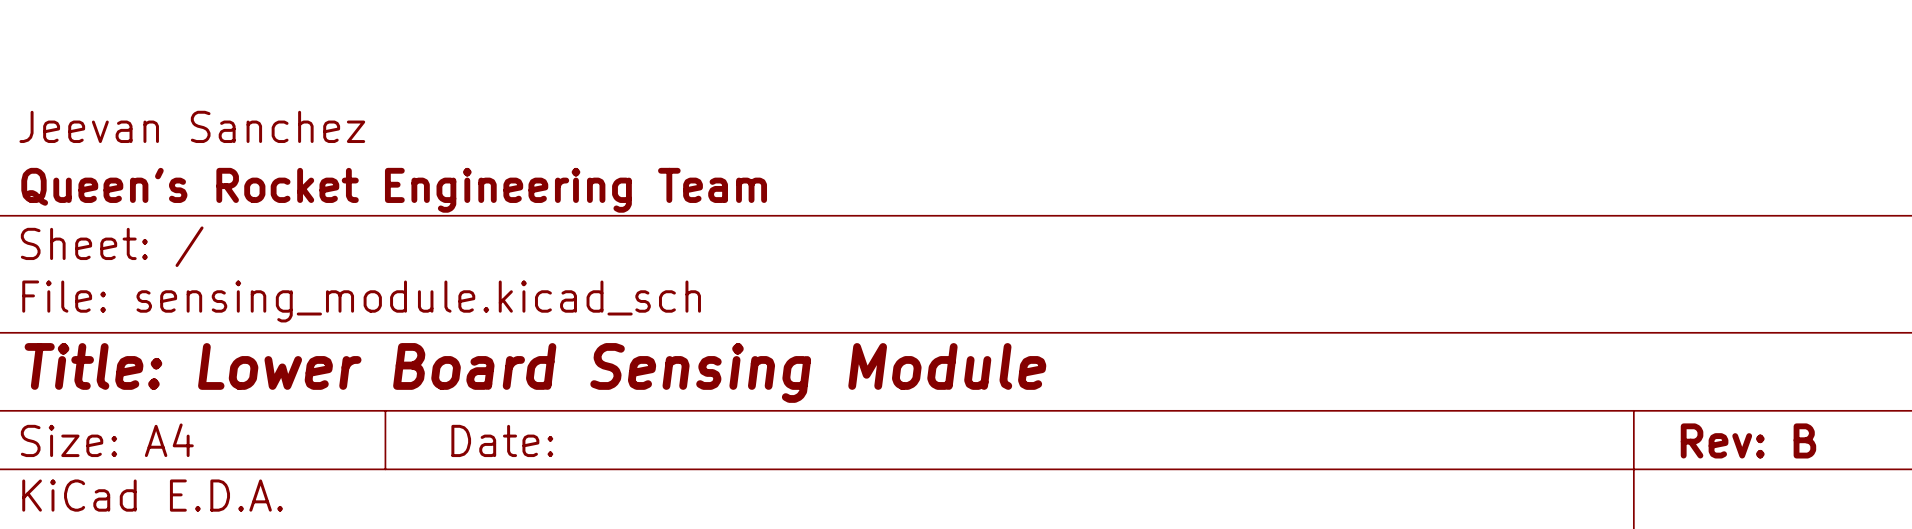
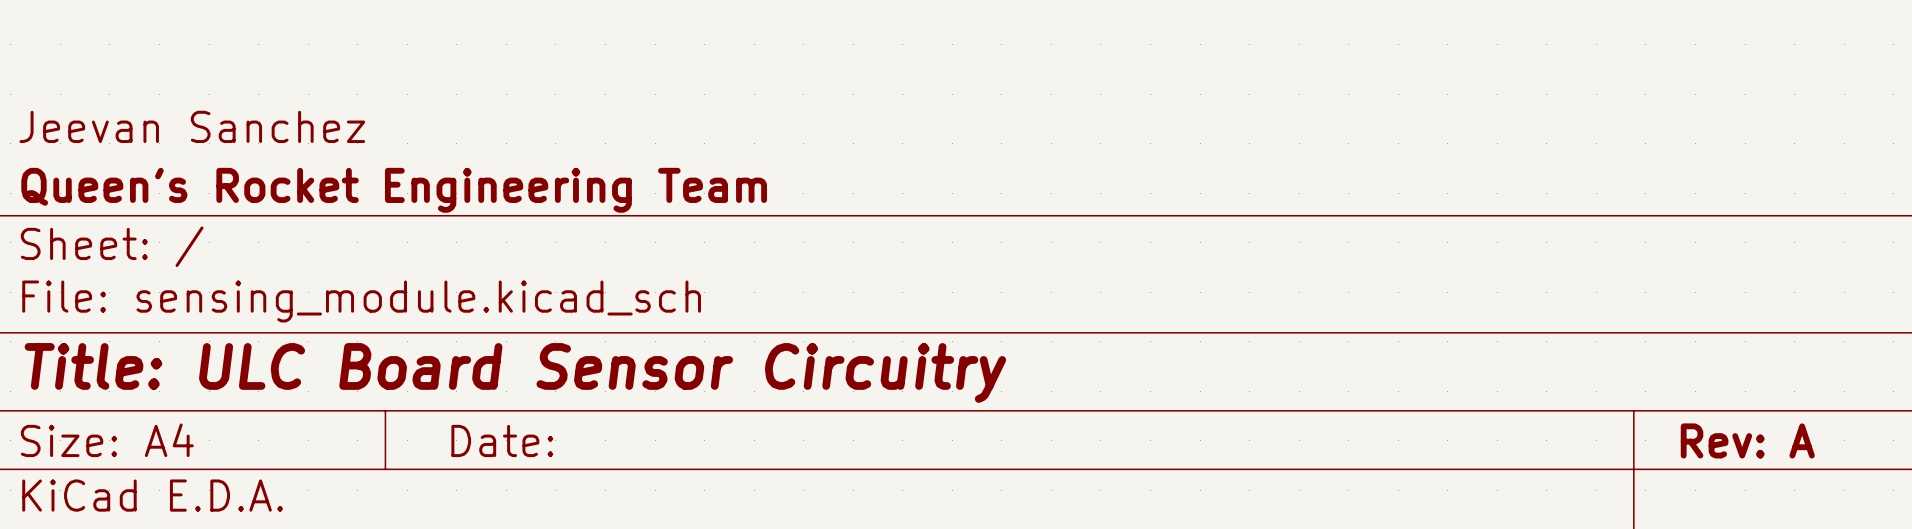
title block: Title: Lower Board Sensing Module (535, 372) -> Title: ULC Board Sensor Circuitry (515, 372)
title block: Rev: B (1748, 440) -> Rev: A (1747, 440)

